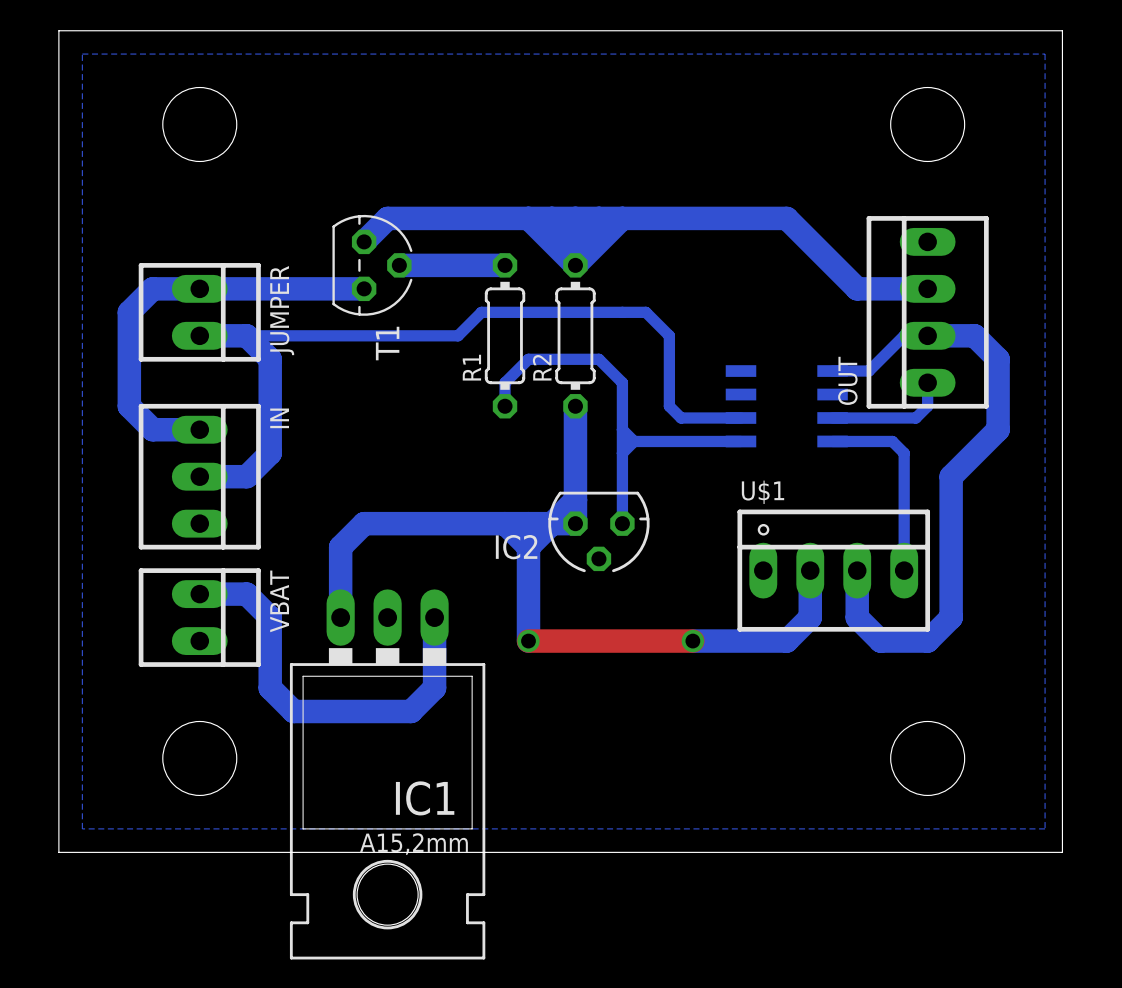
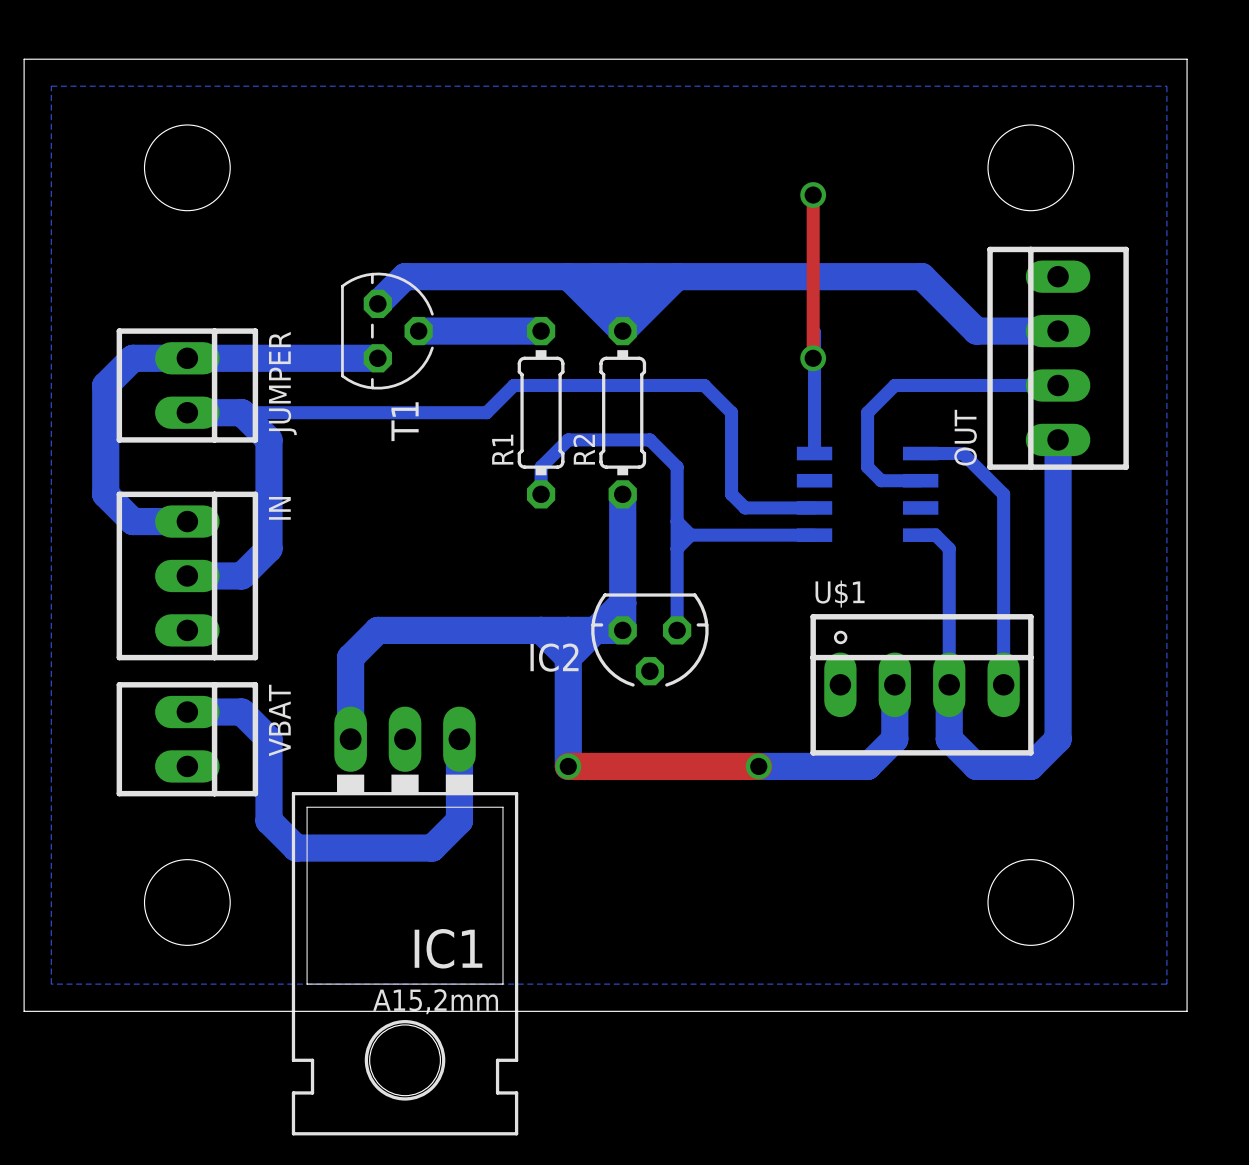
top track: none -> (813, 195) (813, 358)
via: none -> (813, 195)
bottom track: (786, 218) (857, 288) (927, 288) -> (867, 276) (922, 276) (976, 331) (1058, 331)
bottom track: none -> (813, 358) (814, 332) (814, 453)
via: none -> (813, 358)
OUT position: (927, 312) -> (1058, 358)
bottom track: none -> (1058, 385) (894, 385) (867, 412) (867, 467) (881, 480) (920, 480)
bottom track: none -> (1058, 439) (1058, 575)
bottom track: (868, 371) (904, 335) (974, 335) (998, 359) (998, 429) (951, 476) -> (962, 453) (1003, 494) (1003, 548)
bottom track: (927, 382) (927, 406) (915, 418) (832, 418) -> none
bottom track: (845, 441) (892, 441) (904, 453) -> (935, 535) (949, 548) (949, 684)

